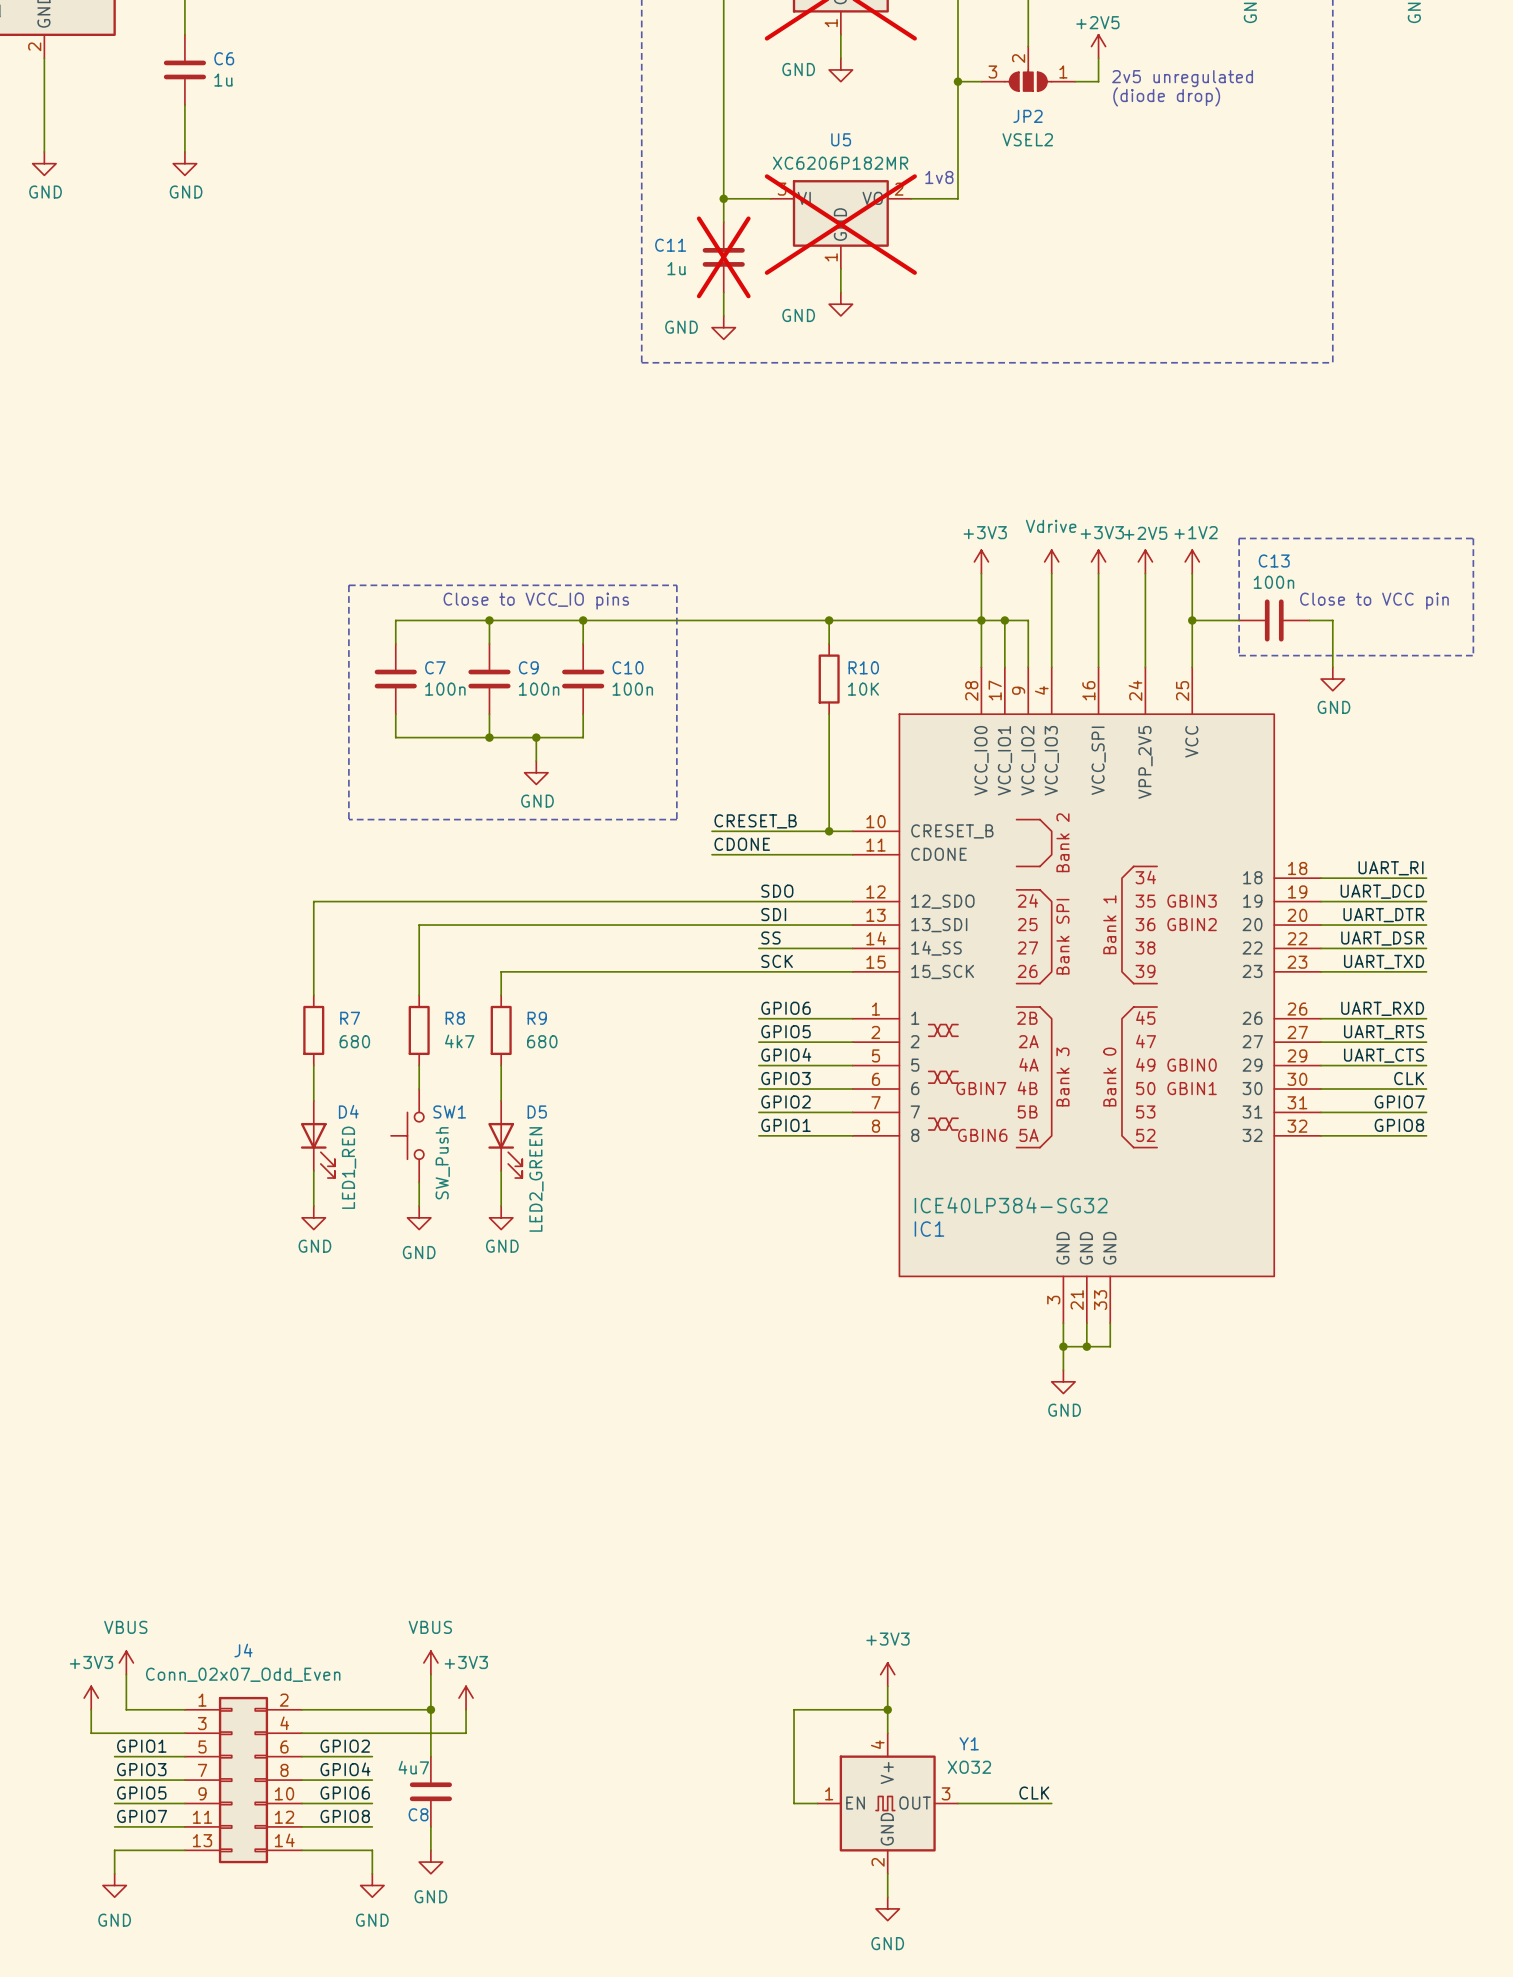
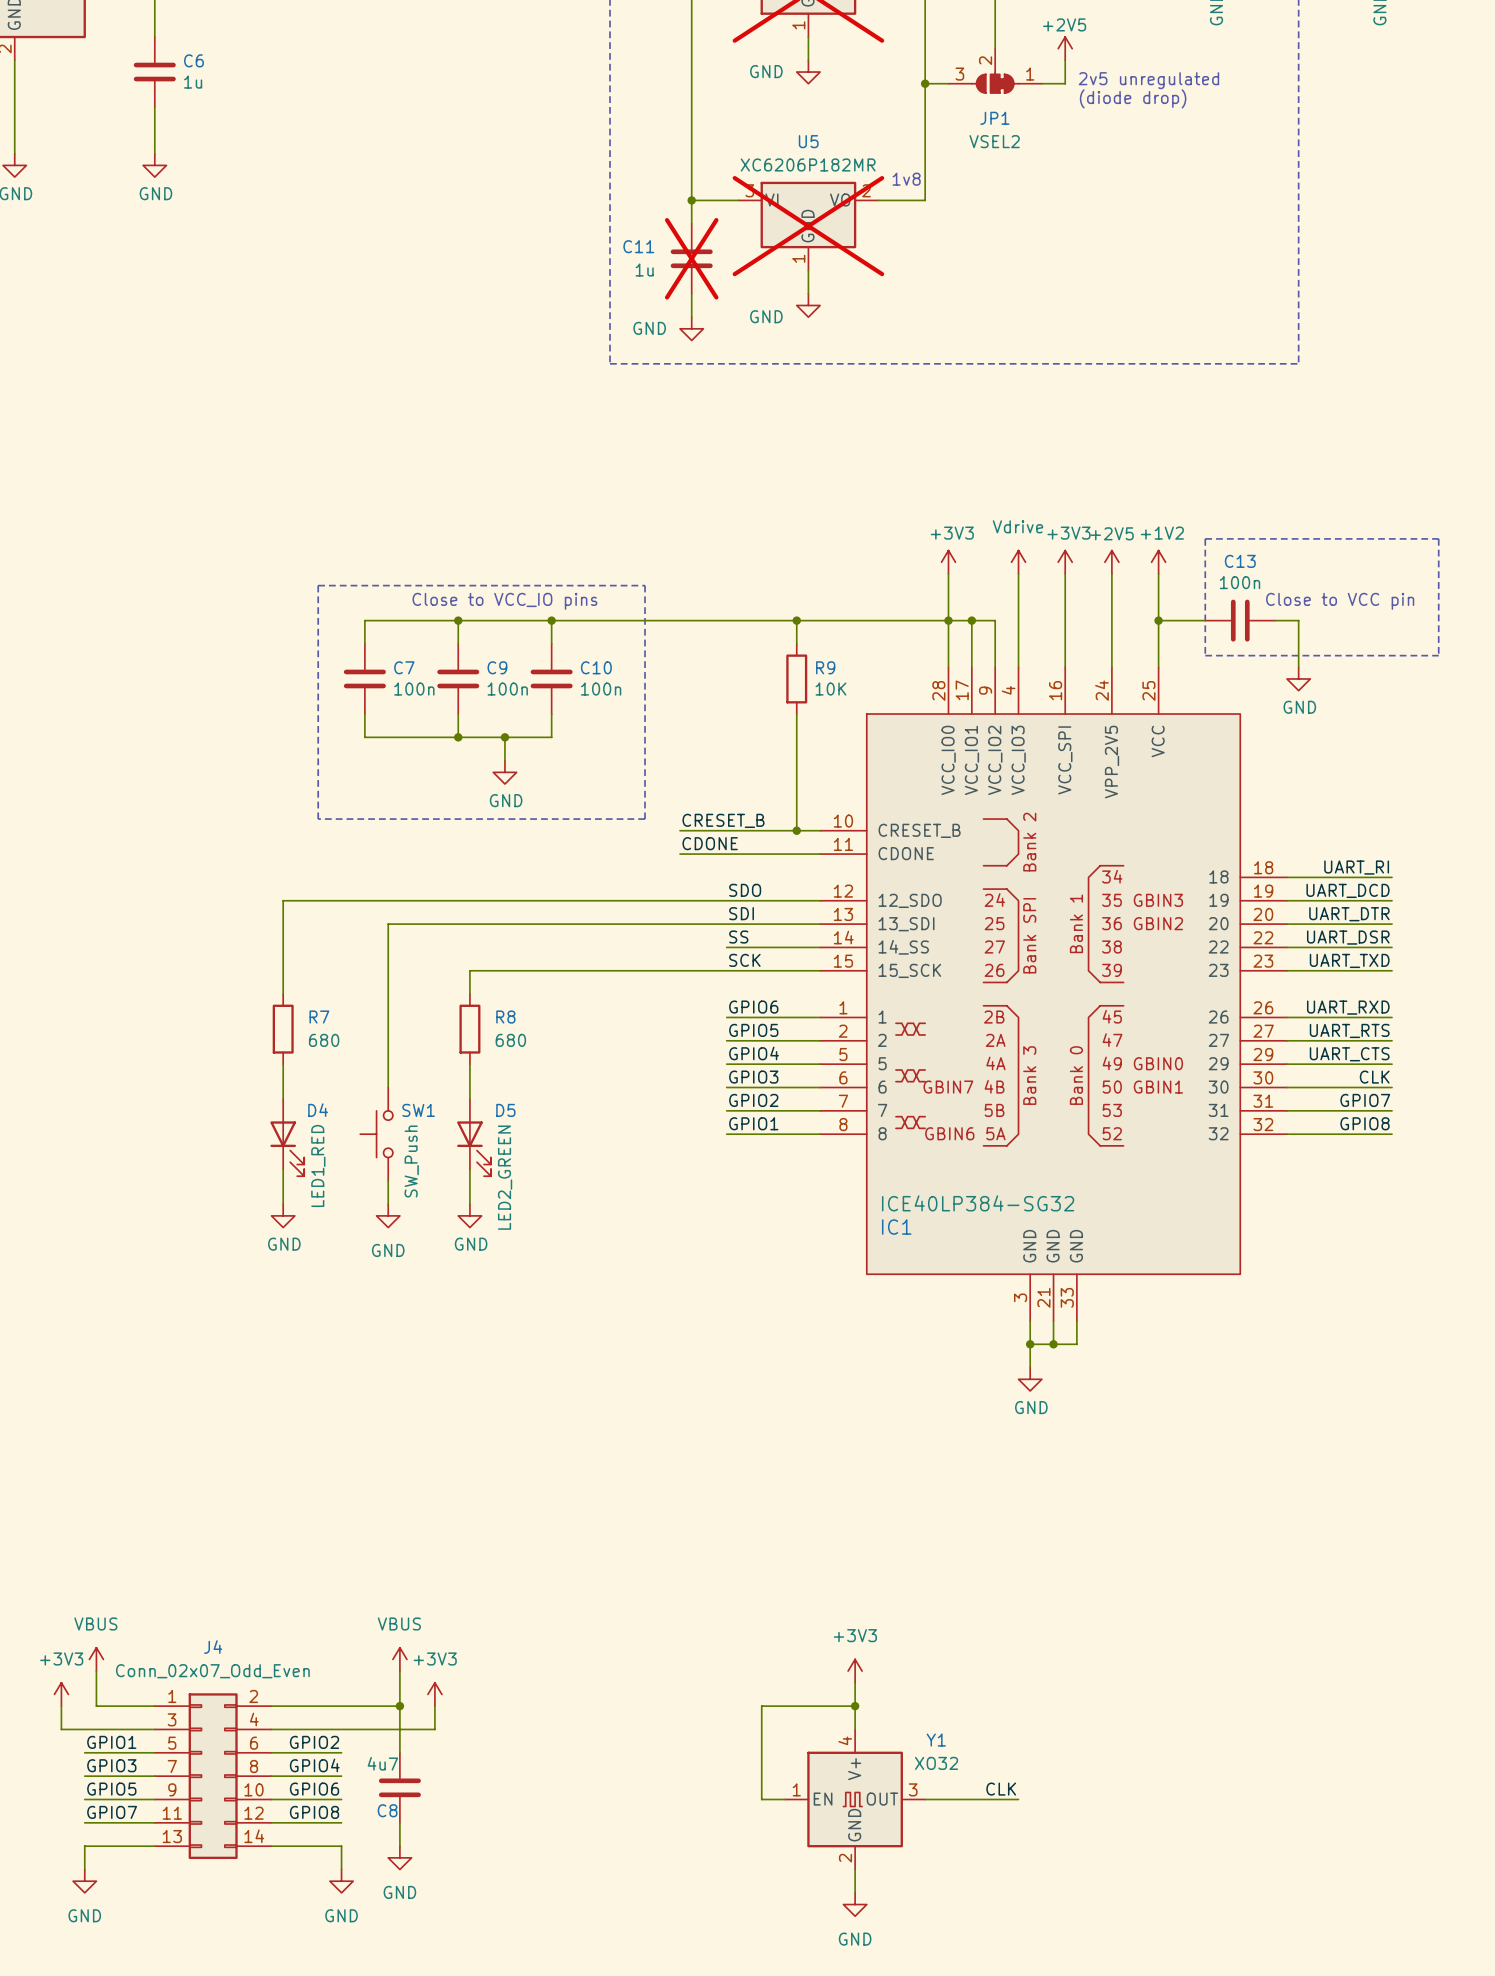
JP2: VSEL2 (1028, 68) -> none
JP1: none -> VSEL2 (995, 70)
R10 name: R10 (863, 667) -> R9 (825, 667)
wire: none -> (388, 994) (388, 1064)
R9 name: R9 (537, 1018) -> R8 (505, 1017)
R8: 4k7 (419, 1030) -> none

